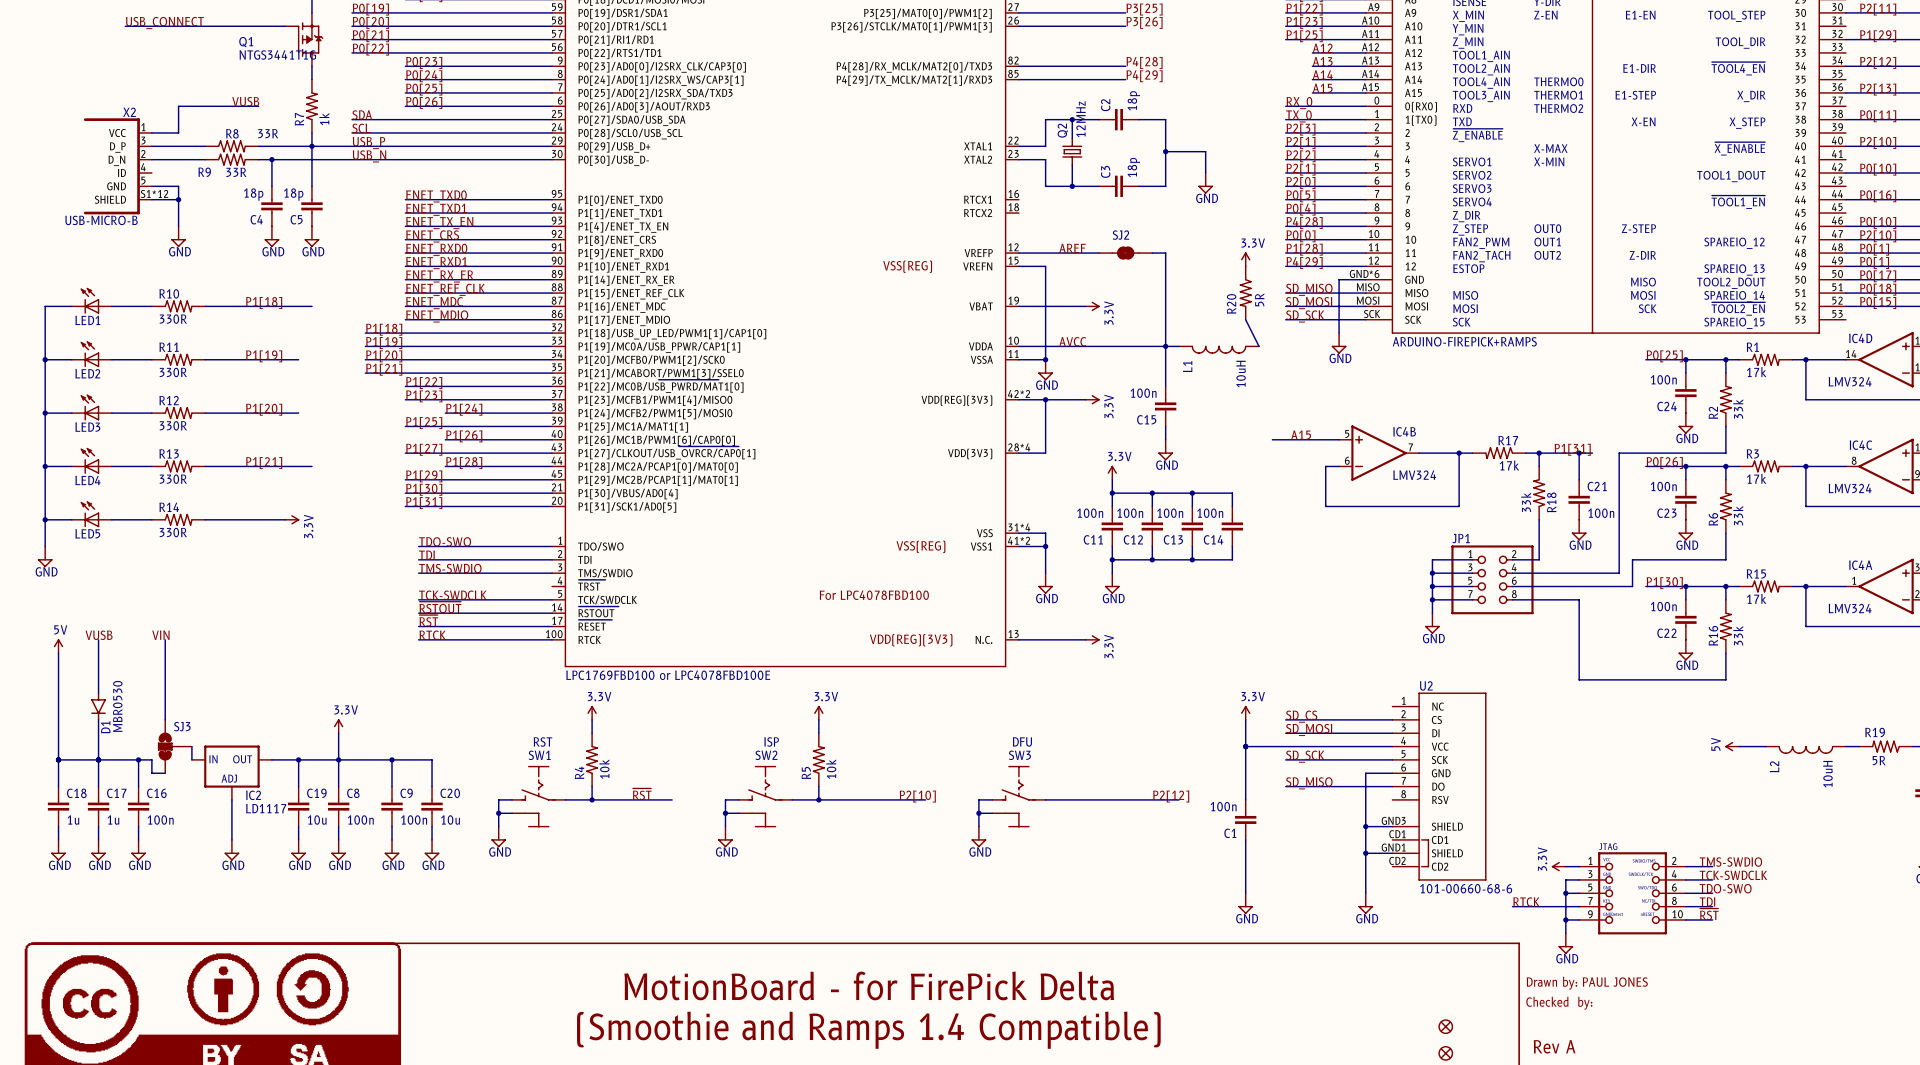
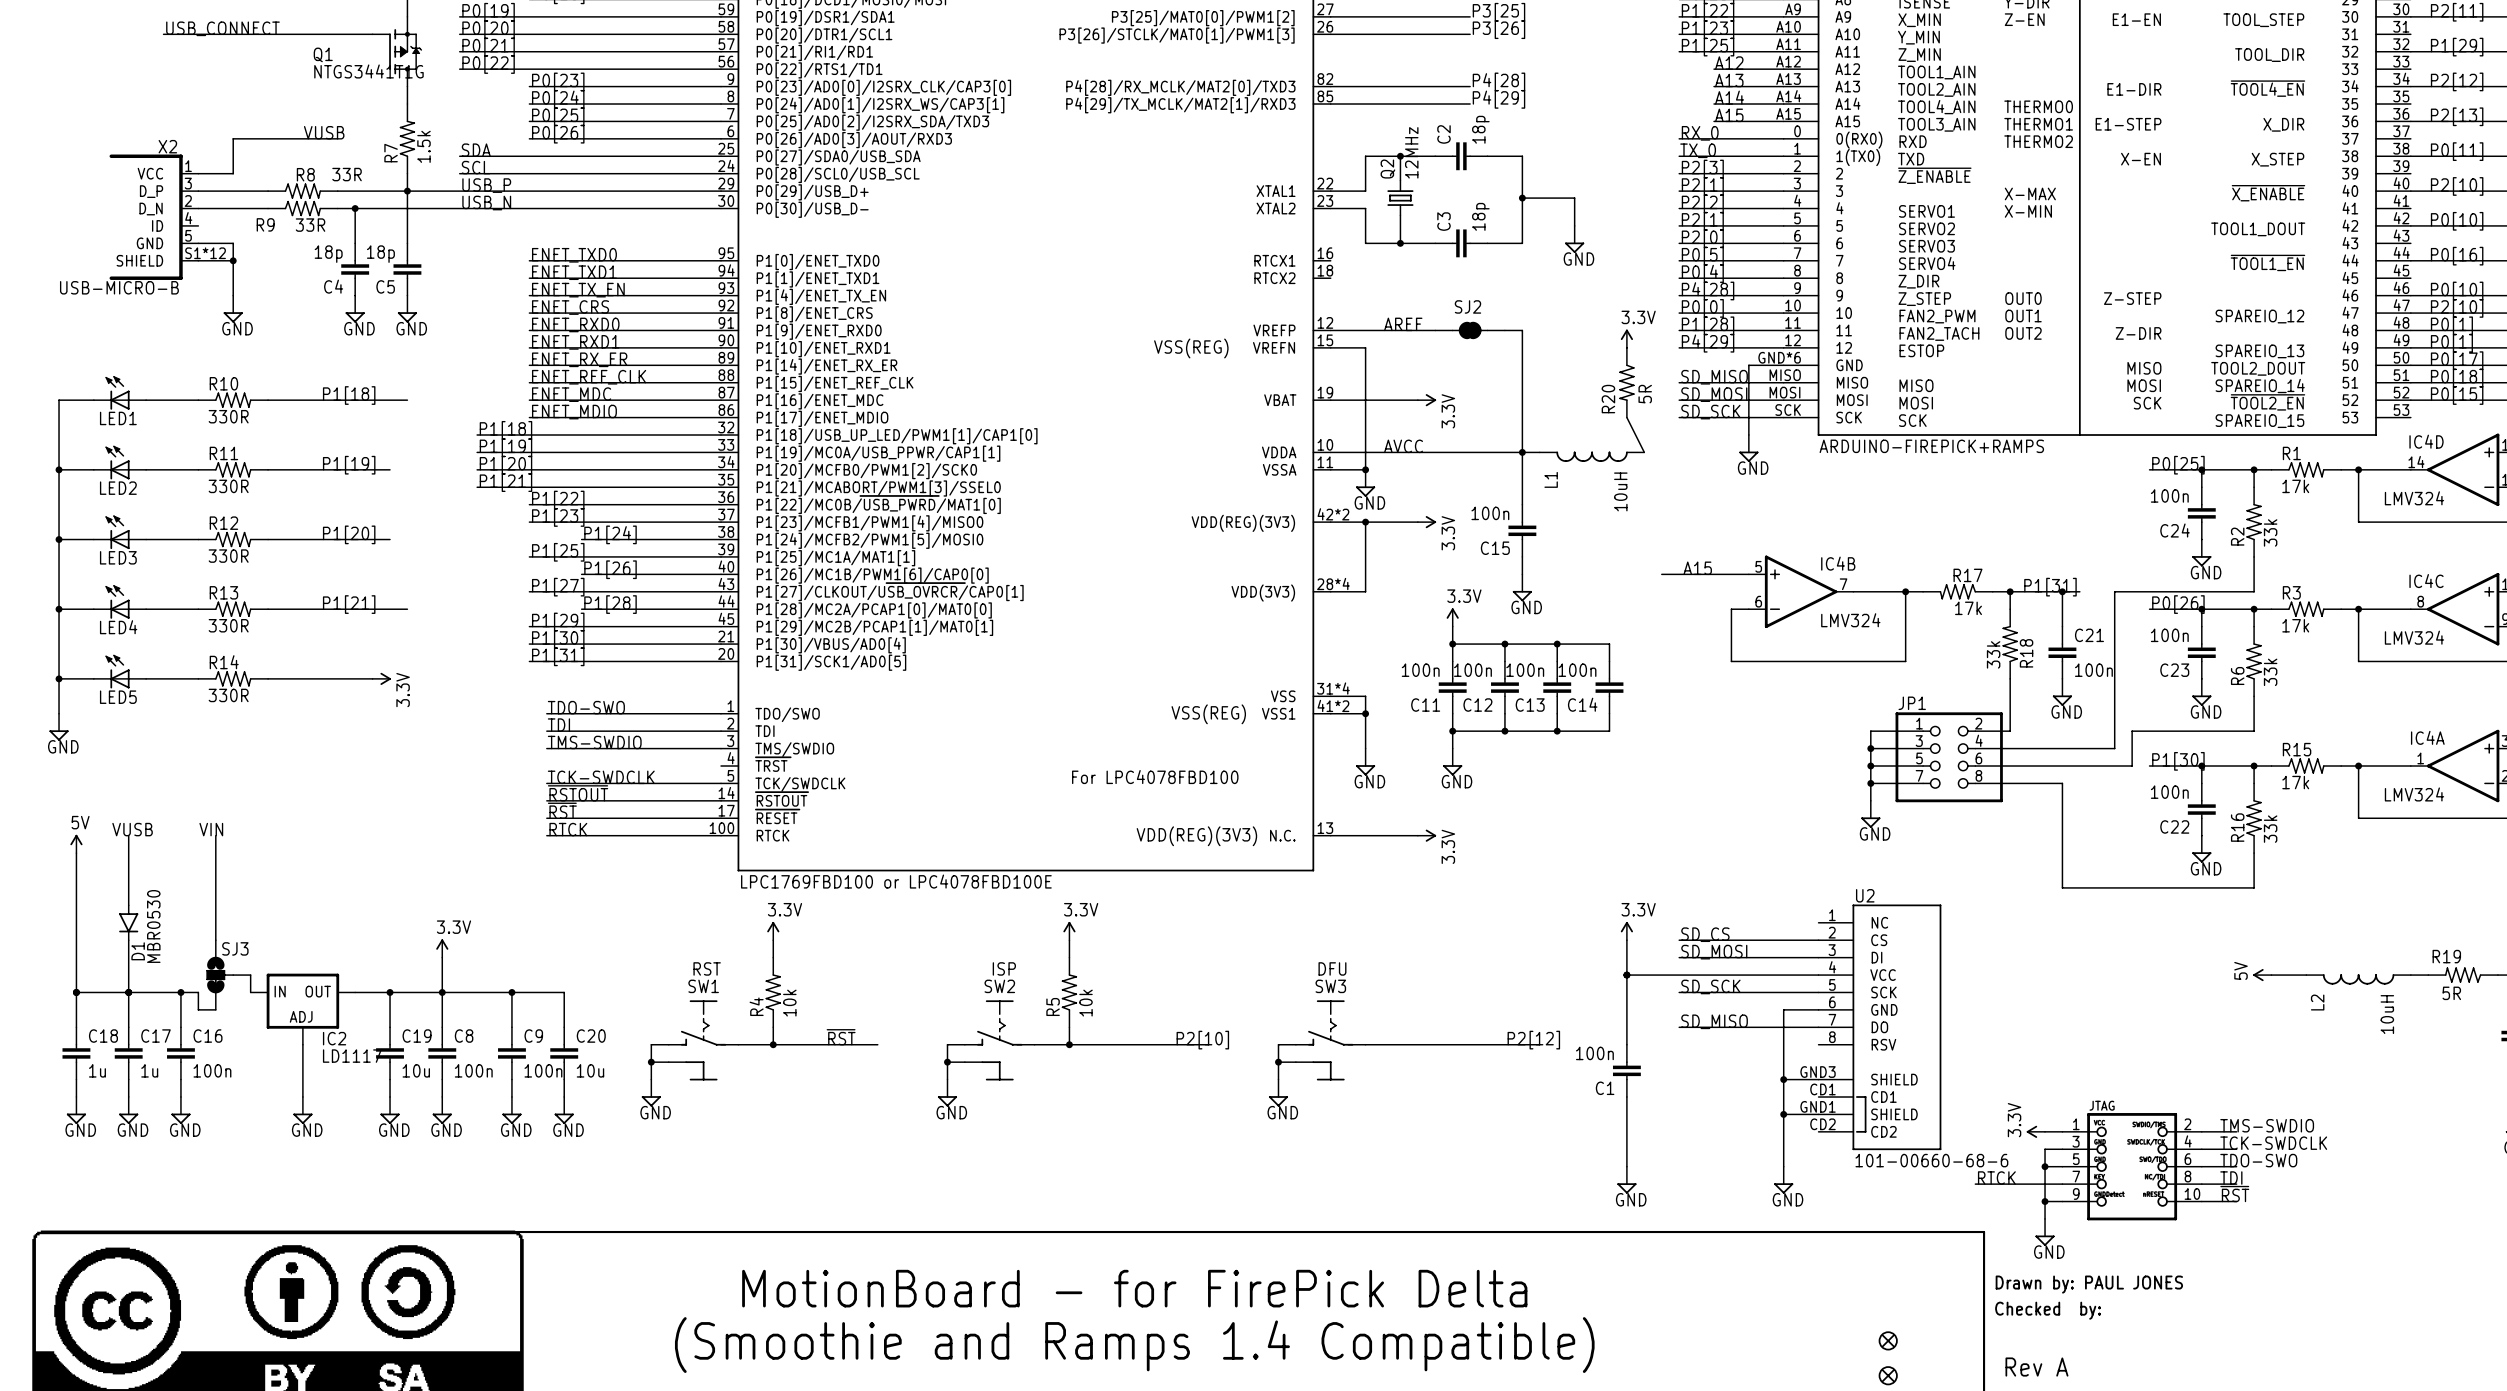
R7 value: 1k (324, 119) -> 1.5k (423, 146)

